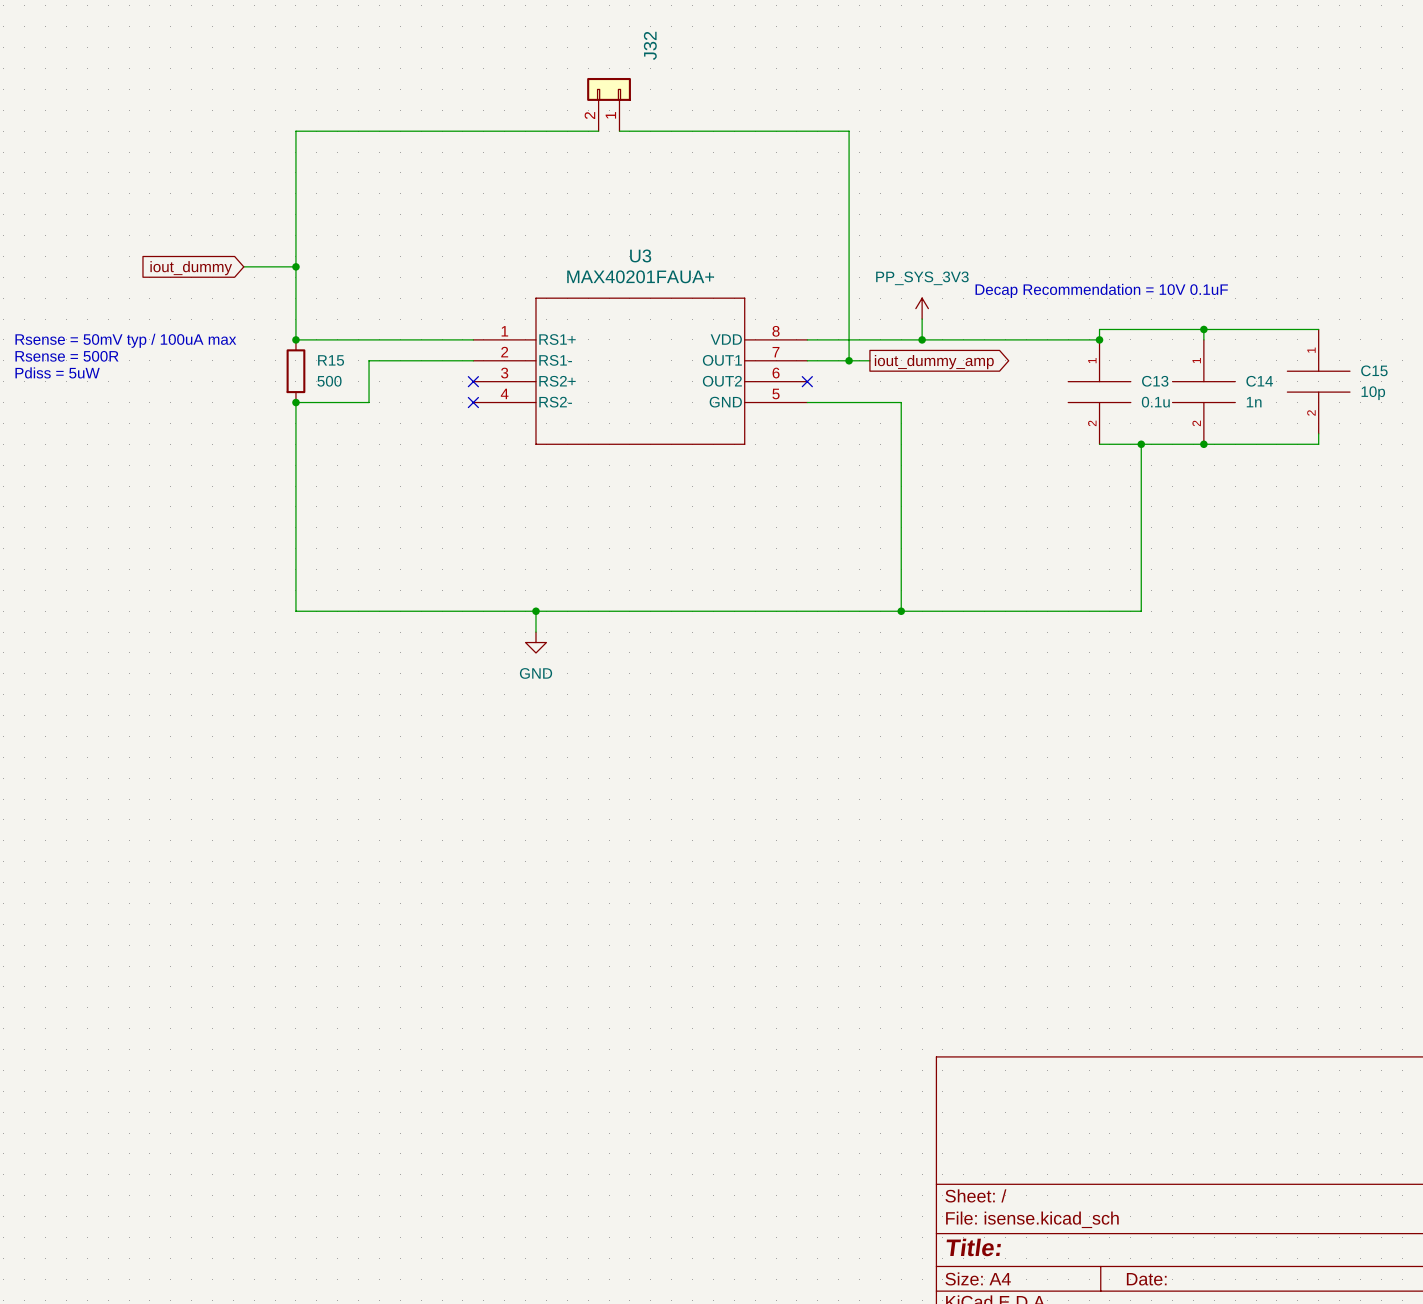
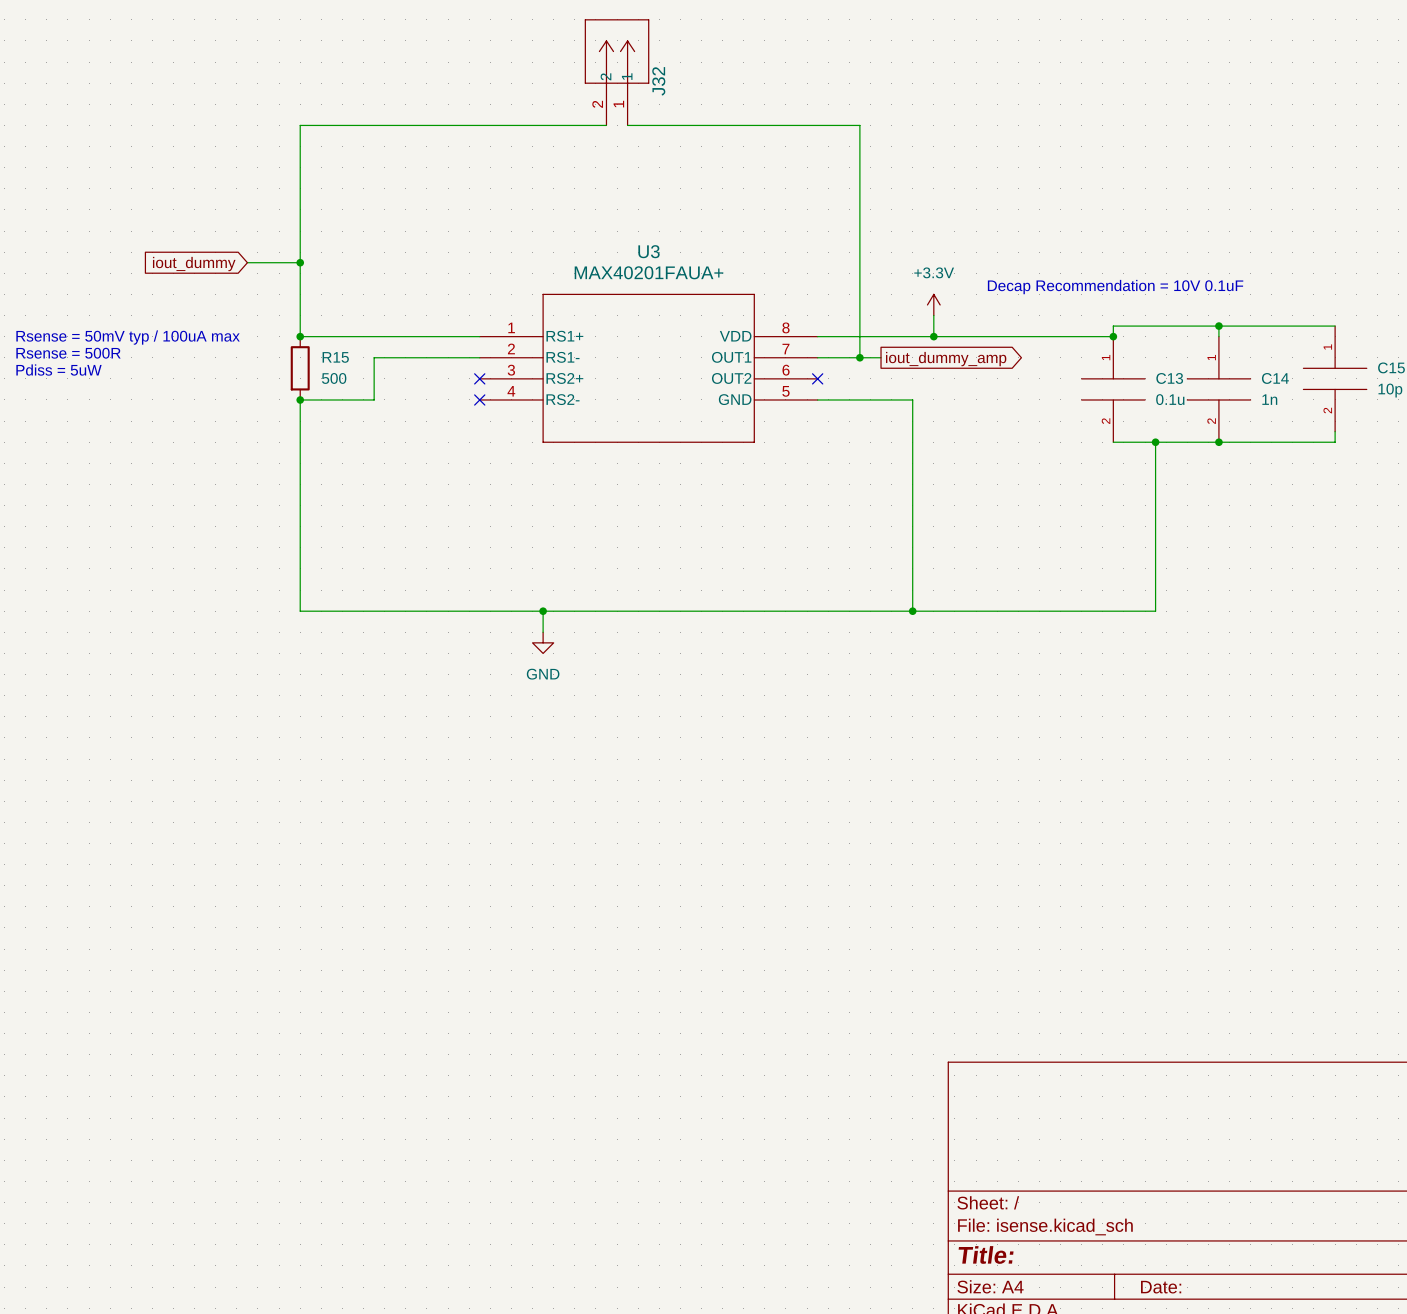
J32 name position: J32 (650, 45) -> J32 (658, 81)
J32 symbol: [587, 77, 631, 132] -> [584, 19, 650, 126]
power symbol: PP_SYS_3V3 (922, 308) -> +3.3V (933, 304)

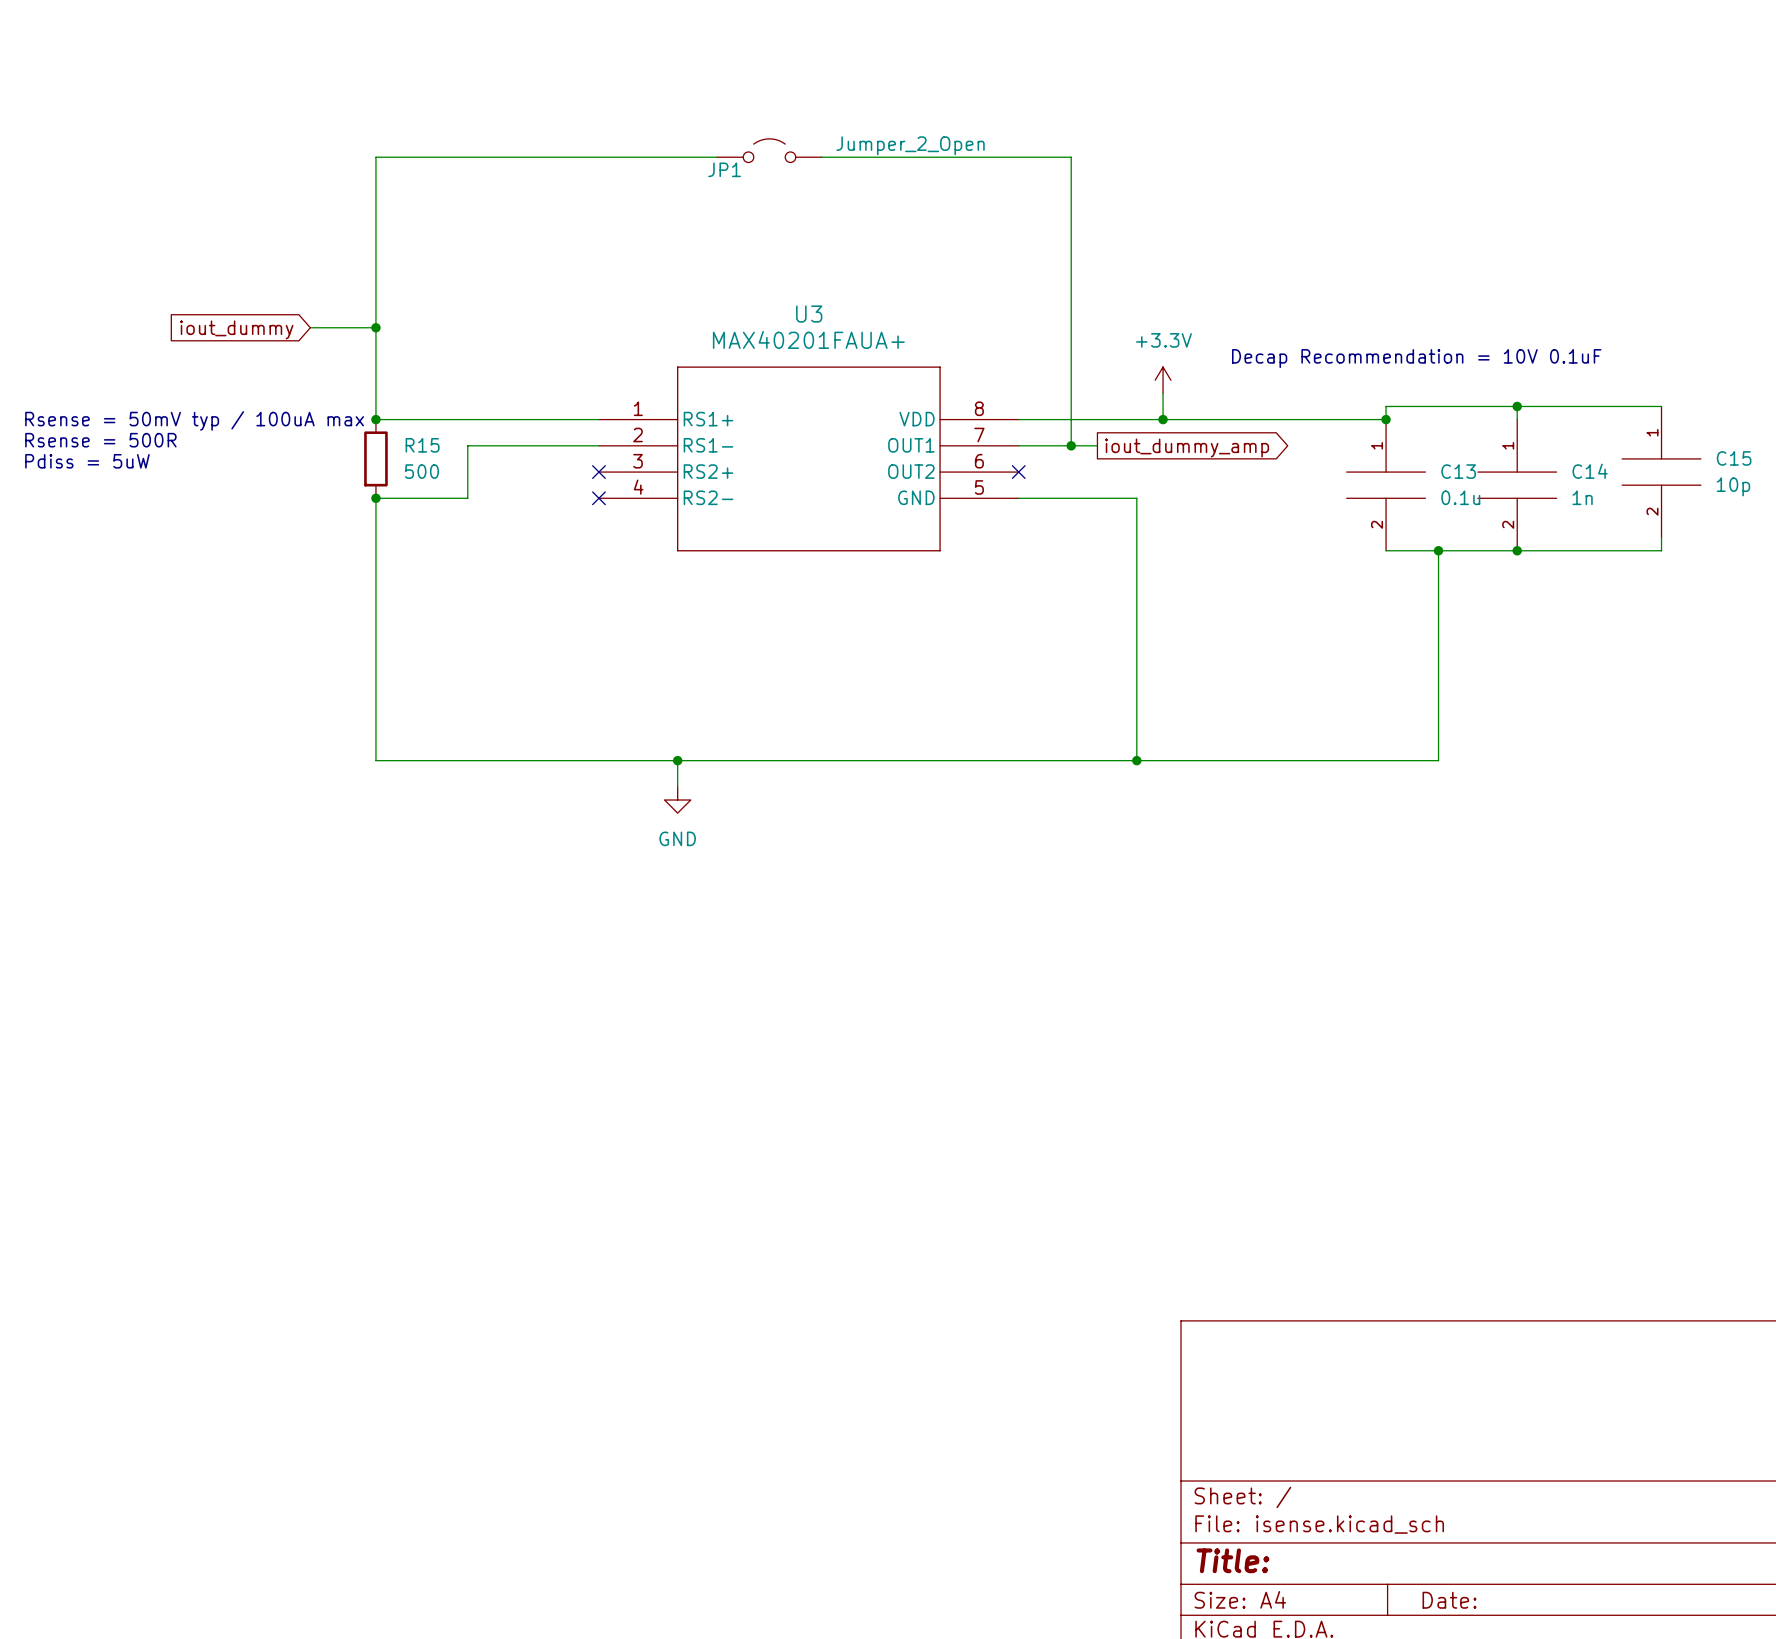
J32: (617, 72) -> none
JP1: none -> Jumper_2_Open (769, 150)

